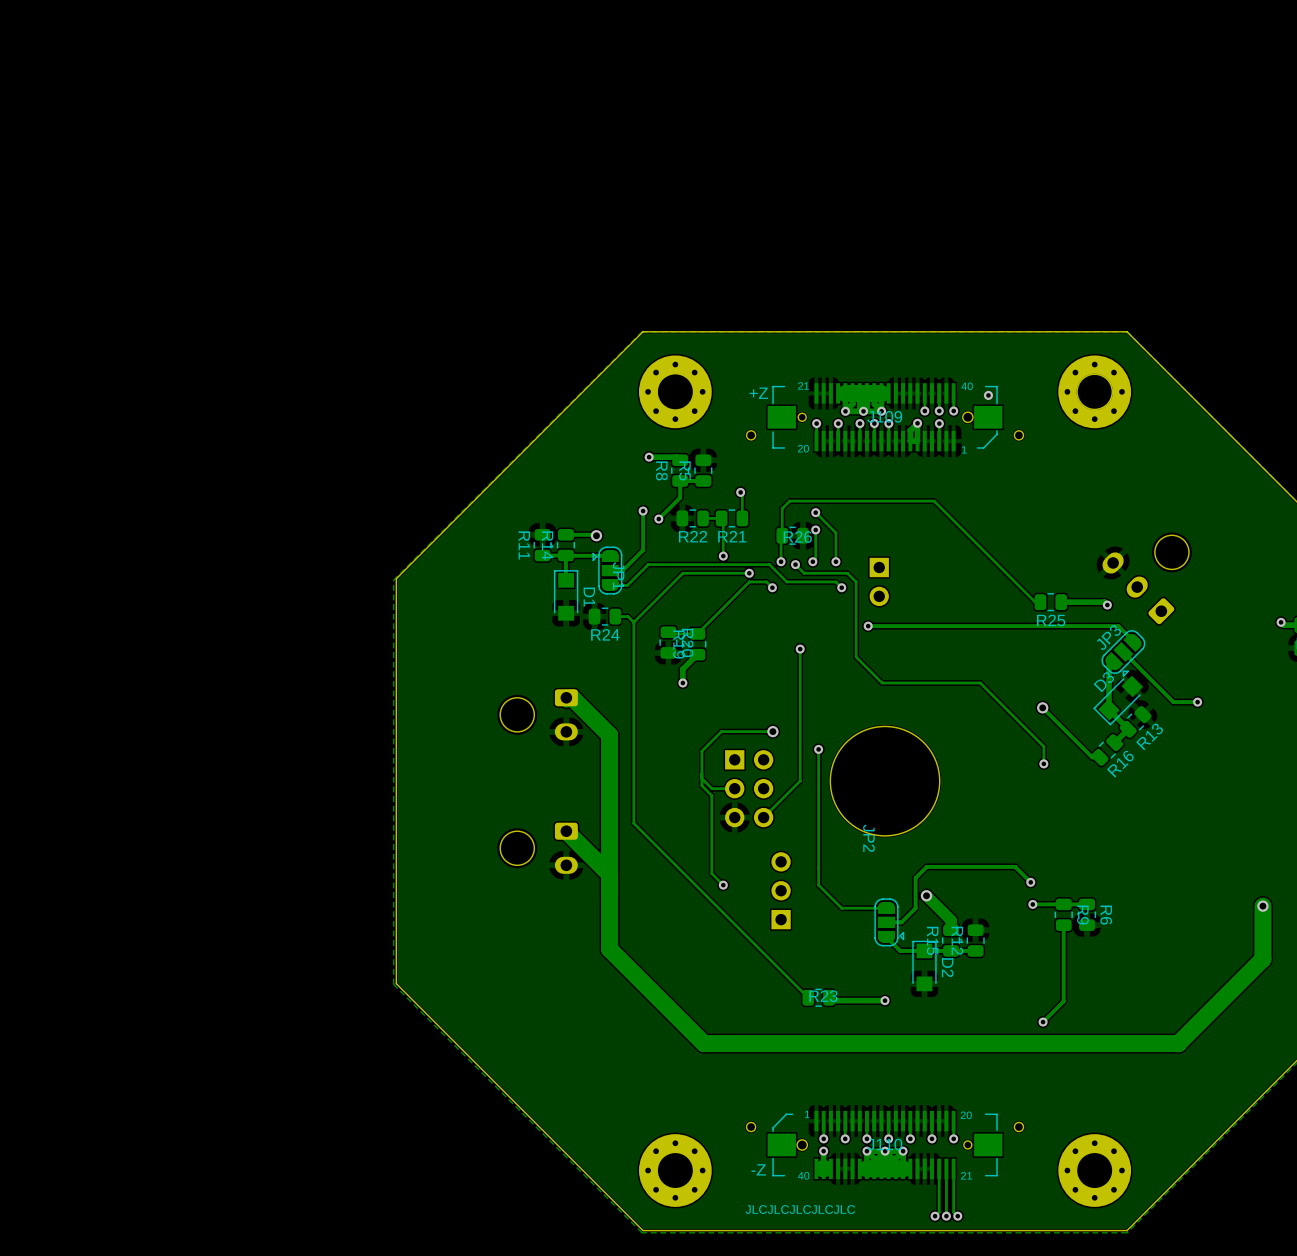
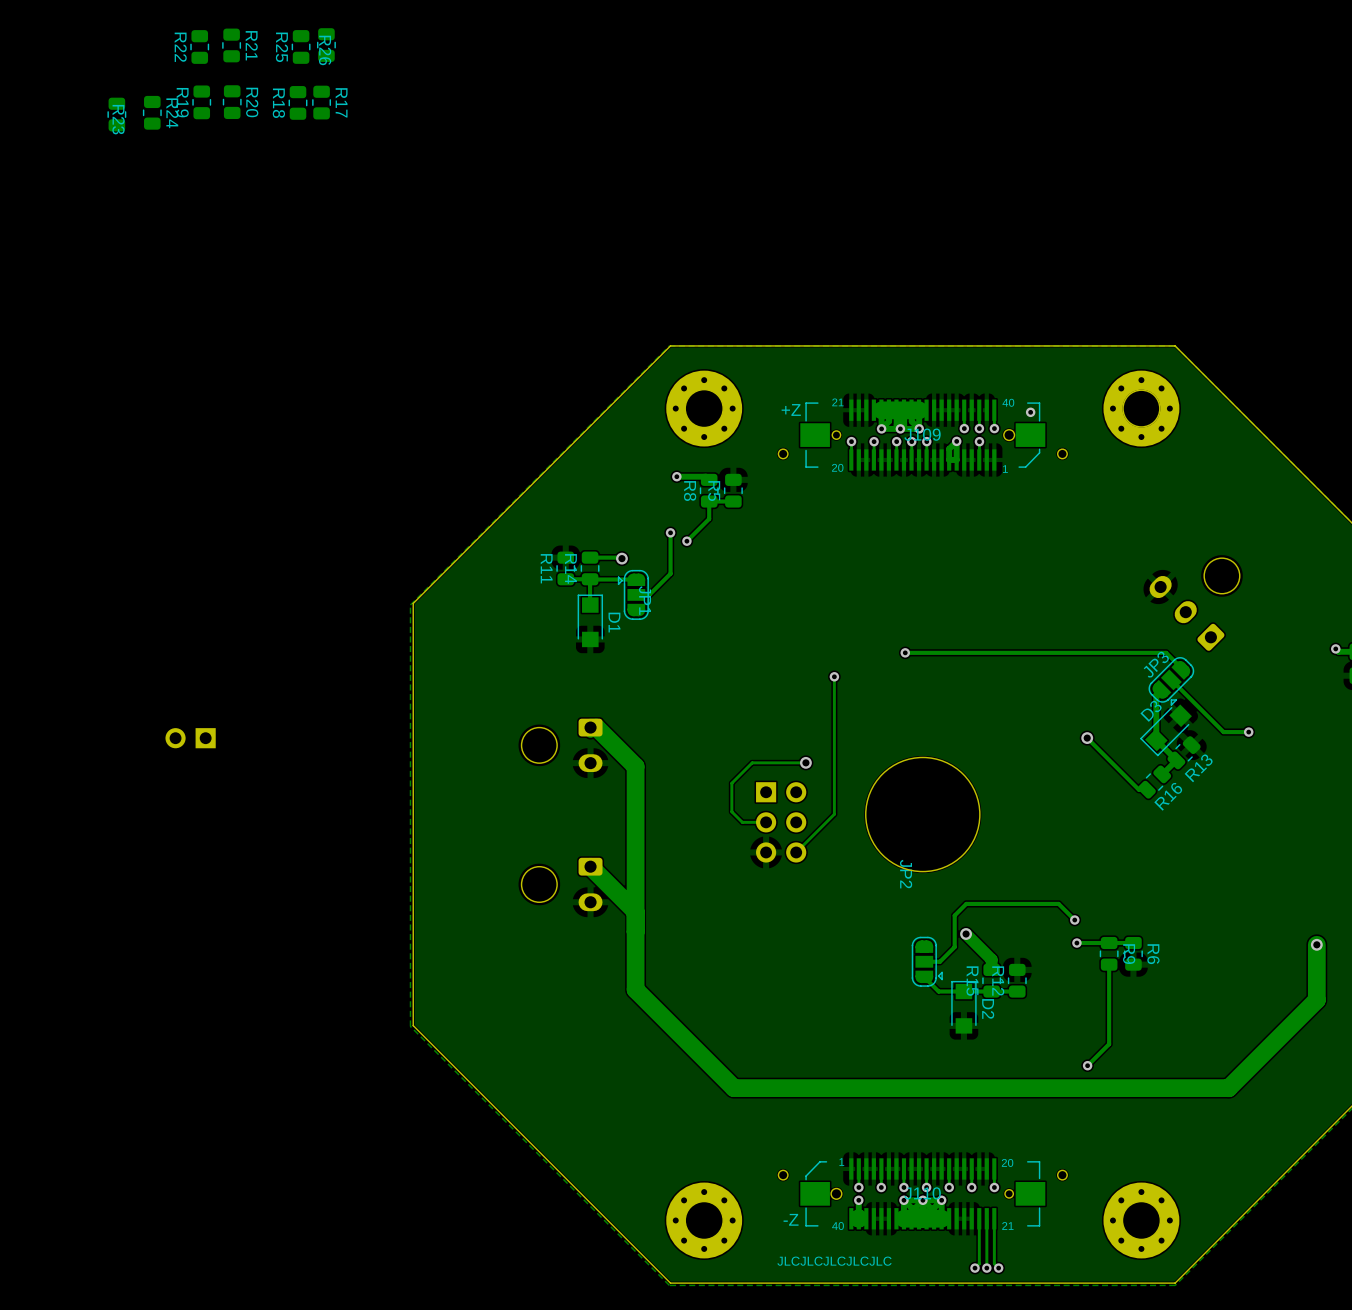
R18: none -> (297, 102)
R17: none -> (321, 102)
track: (740, 492) (742, 494) (742, 518) -> none
via: (740, 492) -> none
track: (815, 512) (835, 532) (835, 561) -> none
via: (815, 512) -> none
R22 rotation: 0° (692, 518) -> 90° clockwise (199, 47)
R22 position: (692, 518) -> (199, 47)
track: (703, 518) (721, 518) (723, 520) (723, 556) -> none
R21 rotation: 0° (731, 518) -> 90° clockwise (231, 45)
R21 position: (731, 518) -> (231, 45)
track: (815, 529) (815, 558) (812, 561) -> none
via: (815, 529) -> none
R26 rotation: 0° (792, 535) -> 90° clockwise (326, 45)
R26 position: (792, 535) -> (326, 45)
R21 name position: R21 (732, 536) -> R21 (251, 45)
via: (723, 556) -> none
track: (781, 561) (782, 508) (789, 501) (934, 501) (1035, 602) (1040, 602) -> none
via: (781, 561) -> none
via: (812, 561) -> none
via: (835, 561) -> none
track: (795, 564) (804, 573) (847, 573) (856, 581) (856, 657) (882, 683) (980, 683) (1043, 746) (1043, 763) -> none
via: (795, 564) -> none
track: (749, 573) (682, 573) (633, 622) -> none
via: (749, 573) -> none
part: (879, 581) -> none
track: (610, 585) (627, 585) (648, 564) (769, 564) (786, 581) (835, 581) (841, 587) -> none
track: (772, 587) (766, 581) (749, 581) (697, 633) (670, 633) (668, 632) -> none
via: (772, 587) -> none
via: (841, 587) -> none
R25 rotation: 0° (1050, 602) -> 90° clockwise (301, 46)
R25 position: (1050, 602) -> (301, 46)
track: (1061, 602) (1104, 602) (1107, 605) -> none
via: (1107, 605) -> none
R24 rotation: 0° (604, 616) -> 90° clockwise (152, 112)
R24 position: (604, 616) -> (152, 112)
track: (615, 616) (628, 616) (633, 622) -> none
track: (633, 622) (633, 823) (808, 997) -> none
R24 name position: R24 (605, 634) -> R24 (172, 113)
R20 position: (668, 642) -> (232, 102)
R19 position: (697, 644) -> (201, 102)
track: (697, 654) (682, 669) (682, 683) -> none
via: (682, 683) -> none
part: none -> (190, 738)
track: (818, 749) (818, 885) (841, 908) (886, 907) -> none
via: (818, 749) -> none
via: (1043, 763) -> none
track: (701, 778) (701, 785) (711, 795) (711, 873) (723, 885) -> none
via: (723, 885) -> none
part: (781, 890) -> none
R23 rotation: 0° (818, 997) -> 90° clockwise (116, 114)
R23 position: (818, 997) -> (116, 114)
track: (828, 997) (831, 1000) (885, 1000) -> none
via: (885, 1000) -> none

